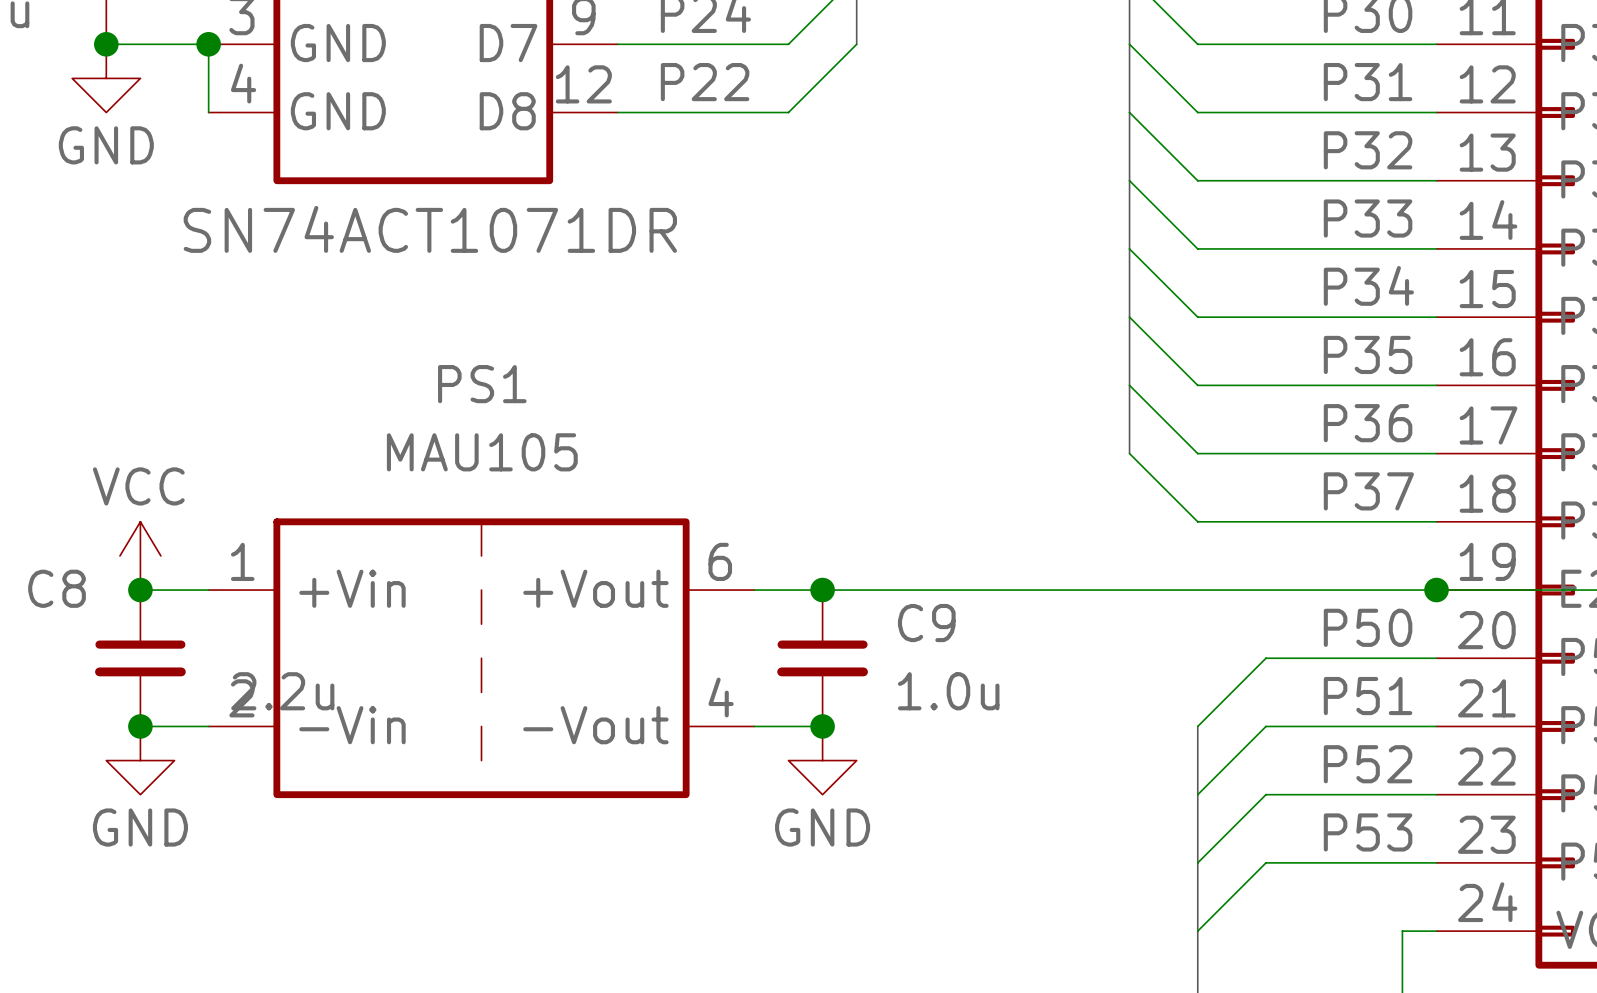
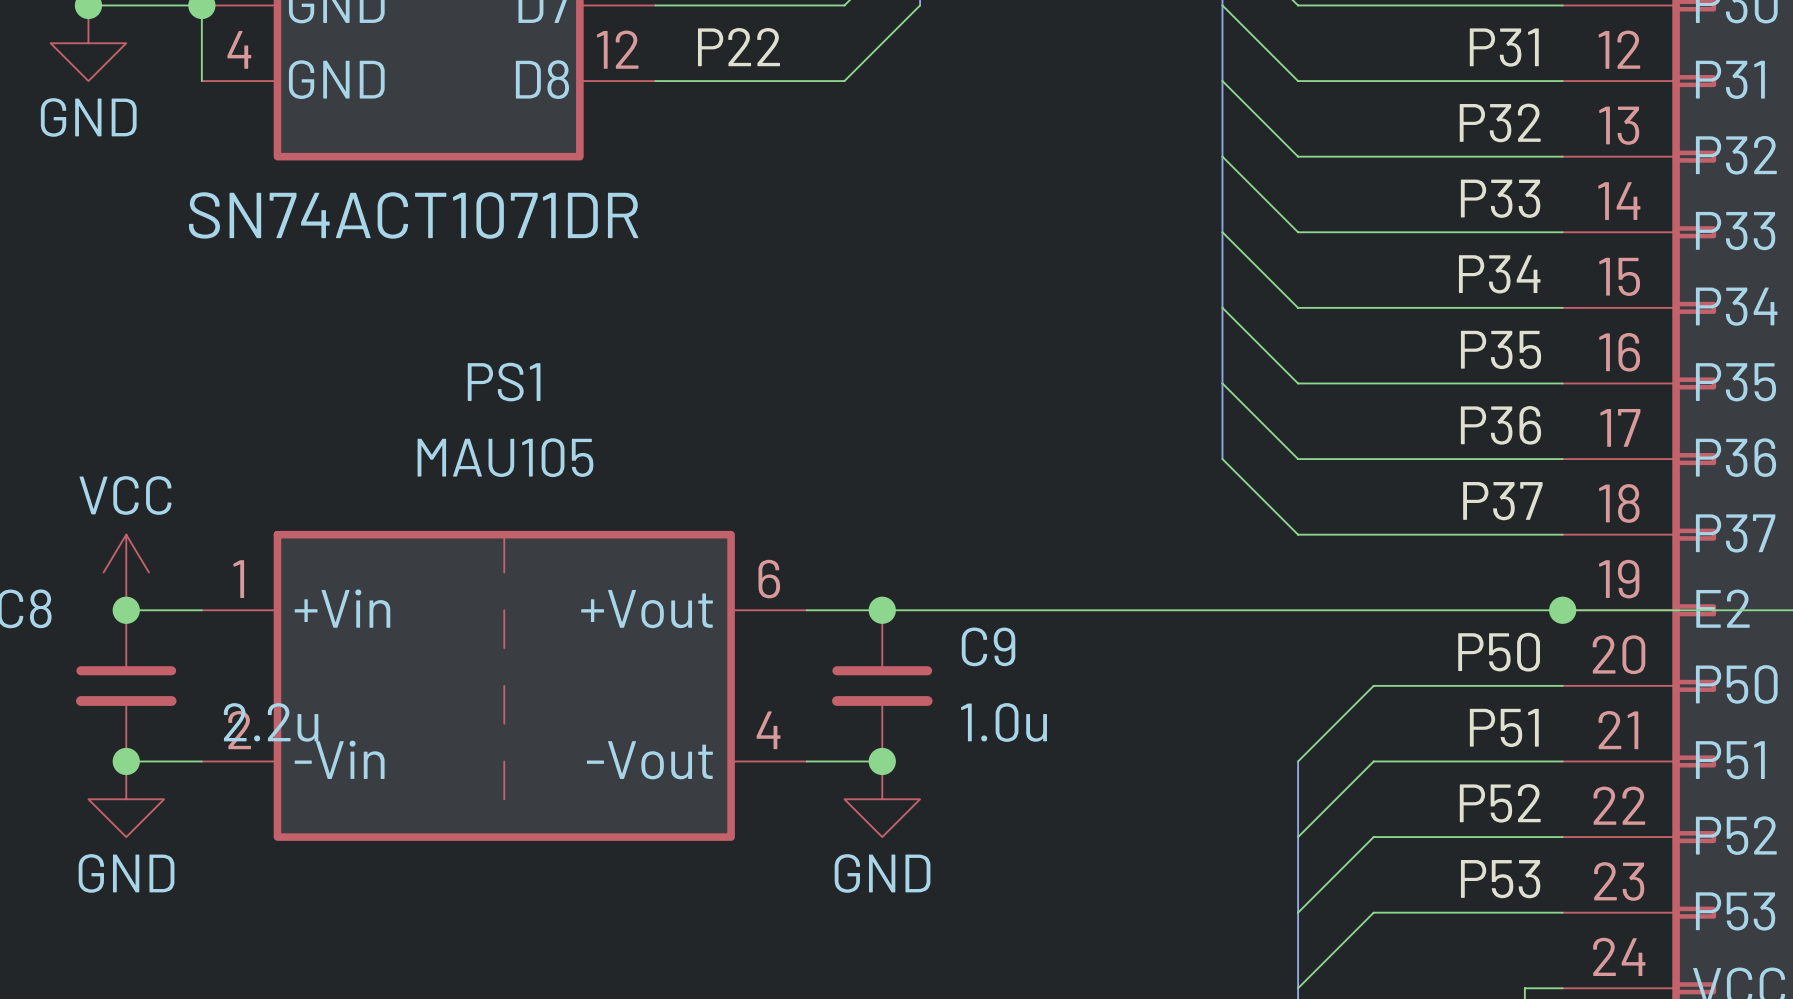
part value position: SN74ACT1071DR (430, 229) -> SN74ACT1071DR (413, 215)

